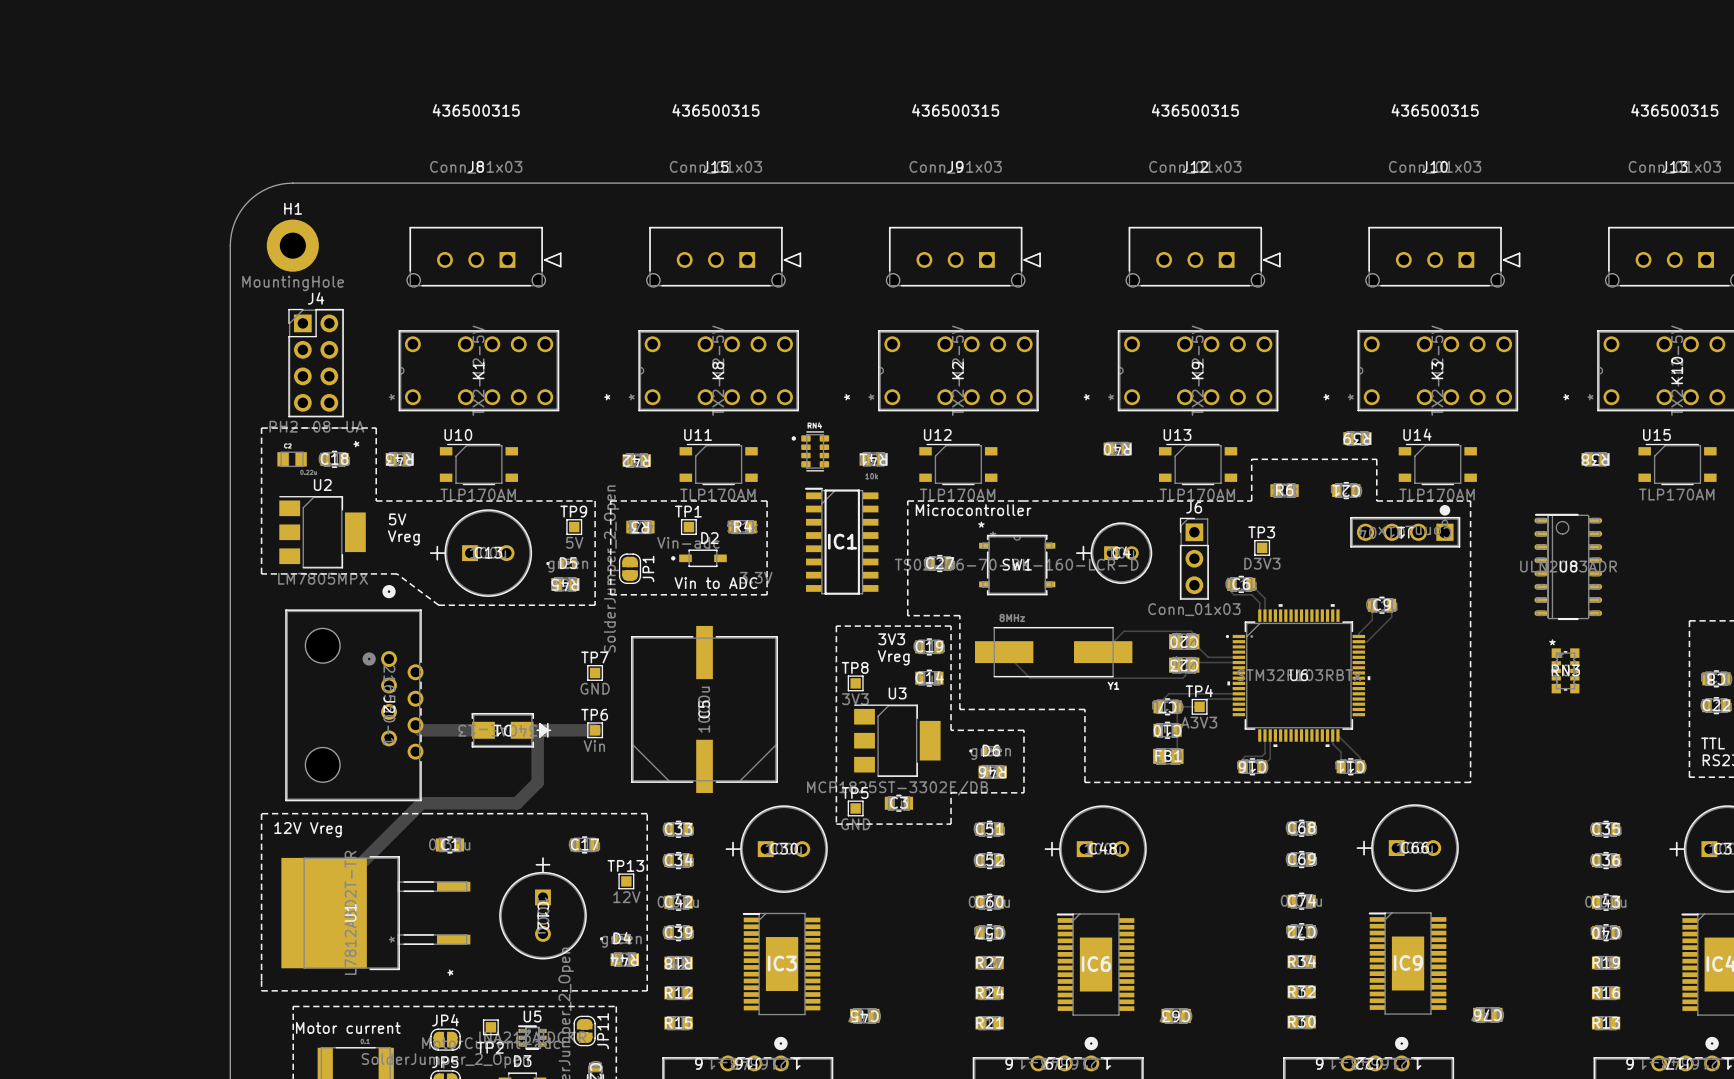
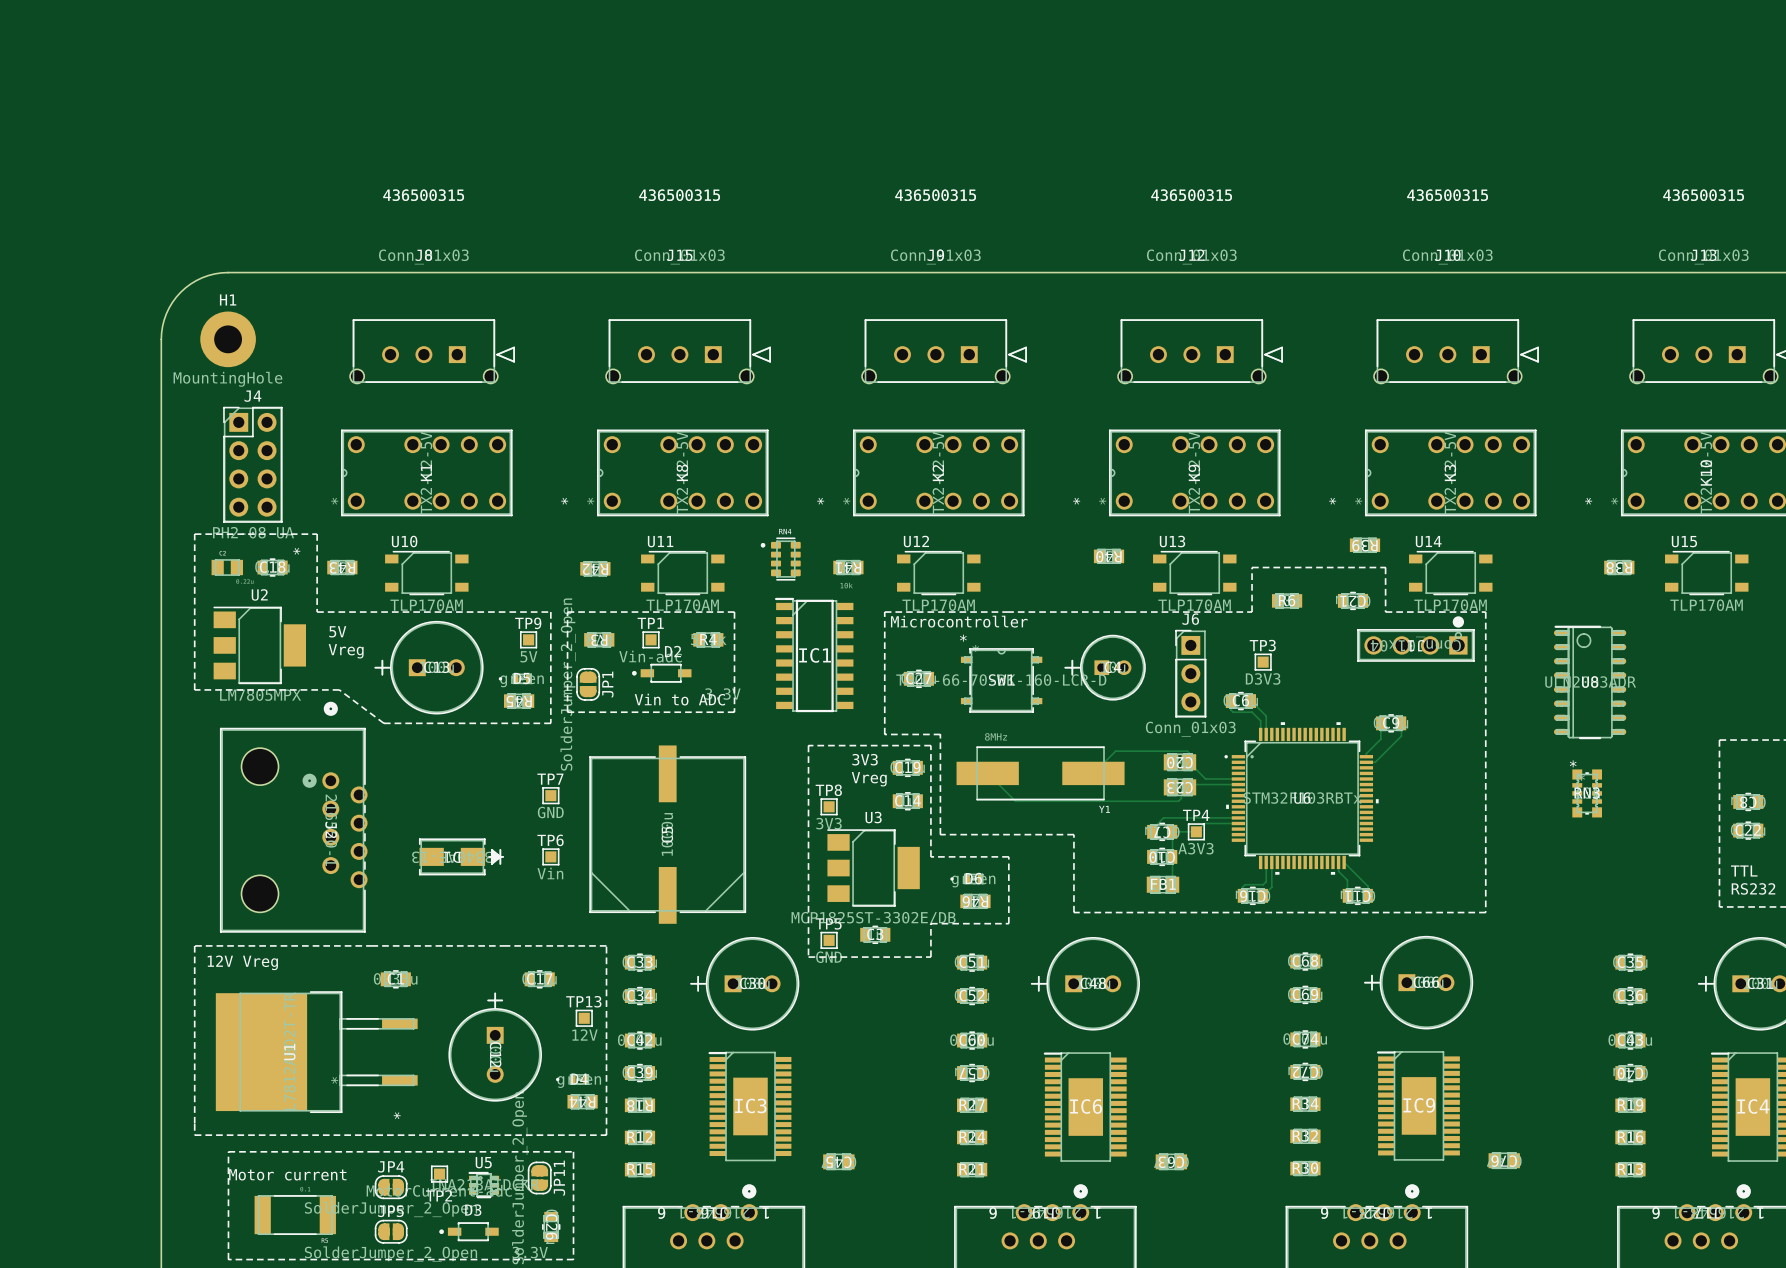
track: (415, 725) (420, 730) (483, 730) -> none
track: (522, 730) (595, 730) -> none
track: (531, 730) (537, 736) (537, 782) (516, 803) (421, 803) (324, 900) (324, 913) -> none

